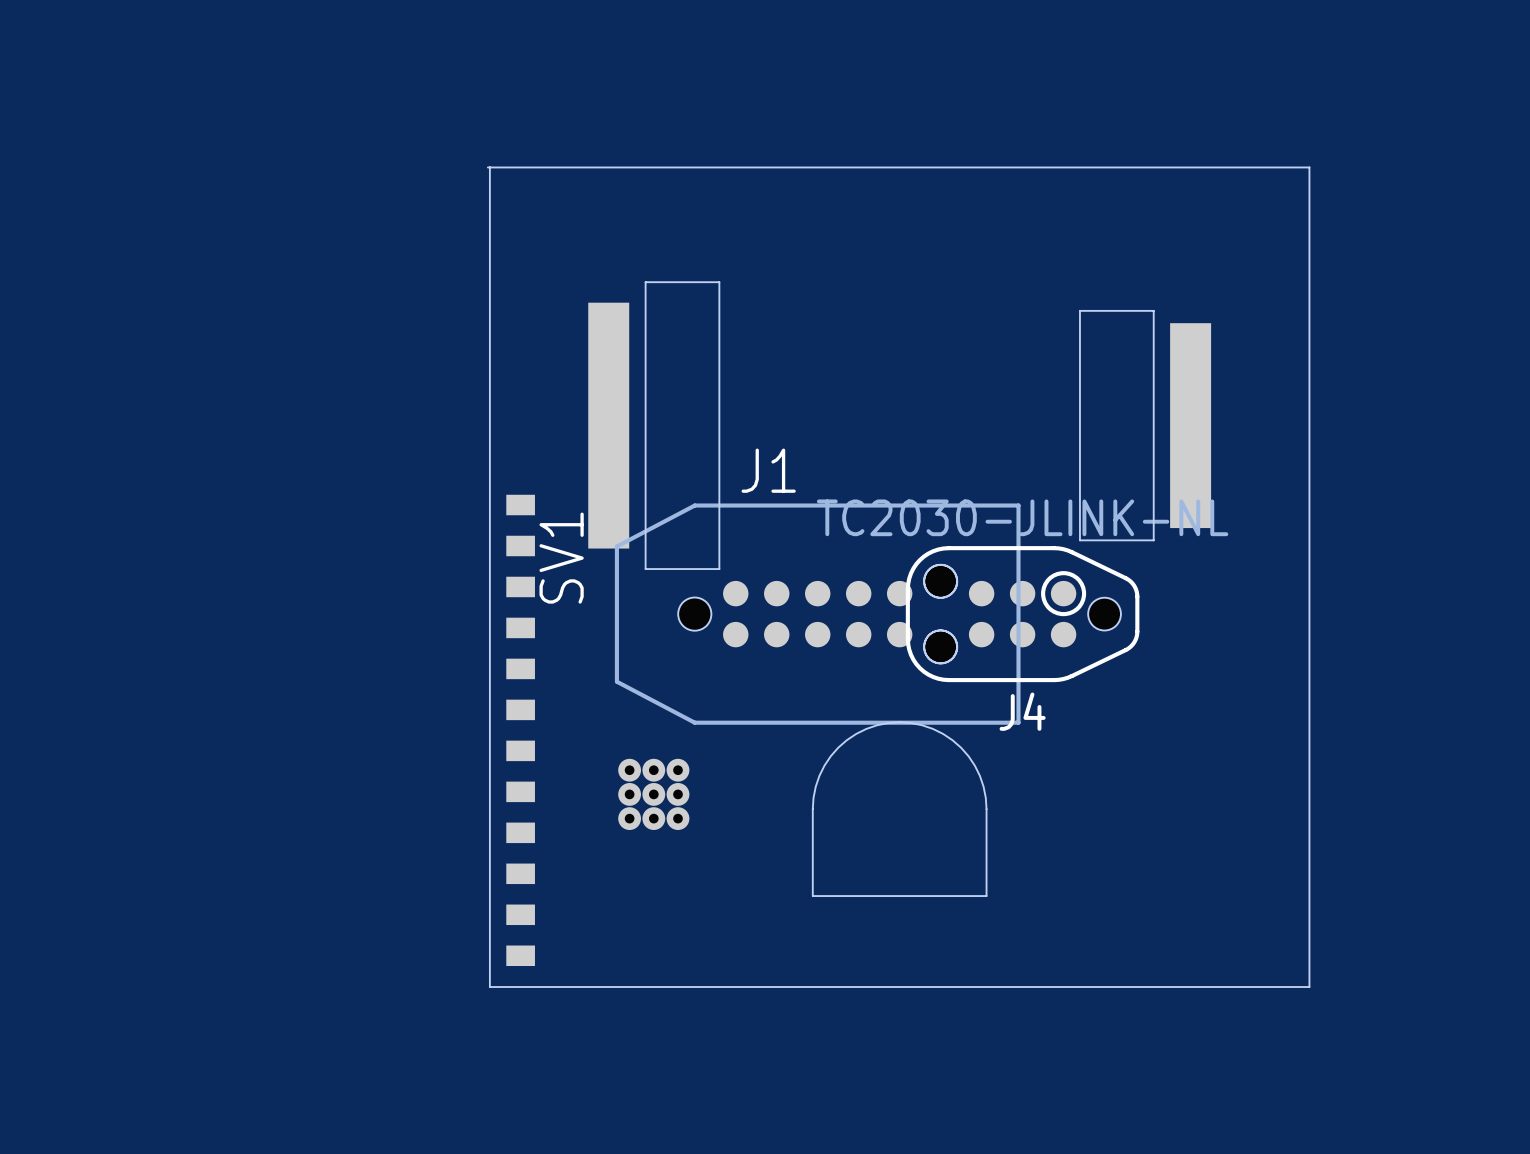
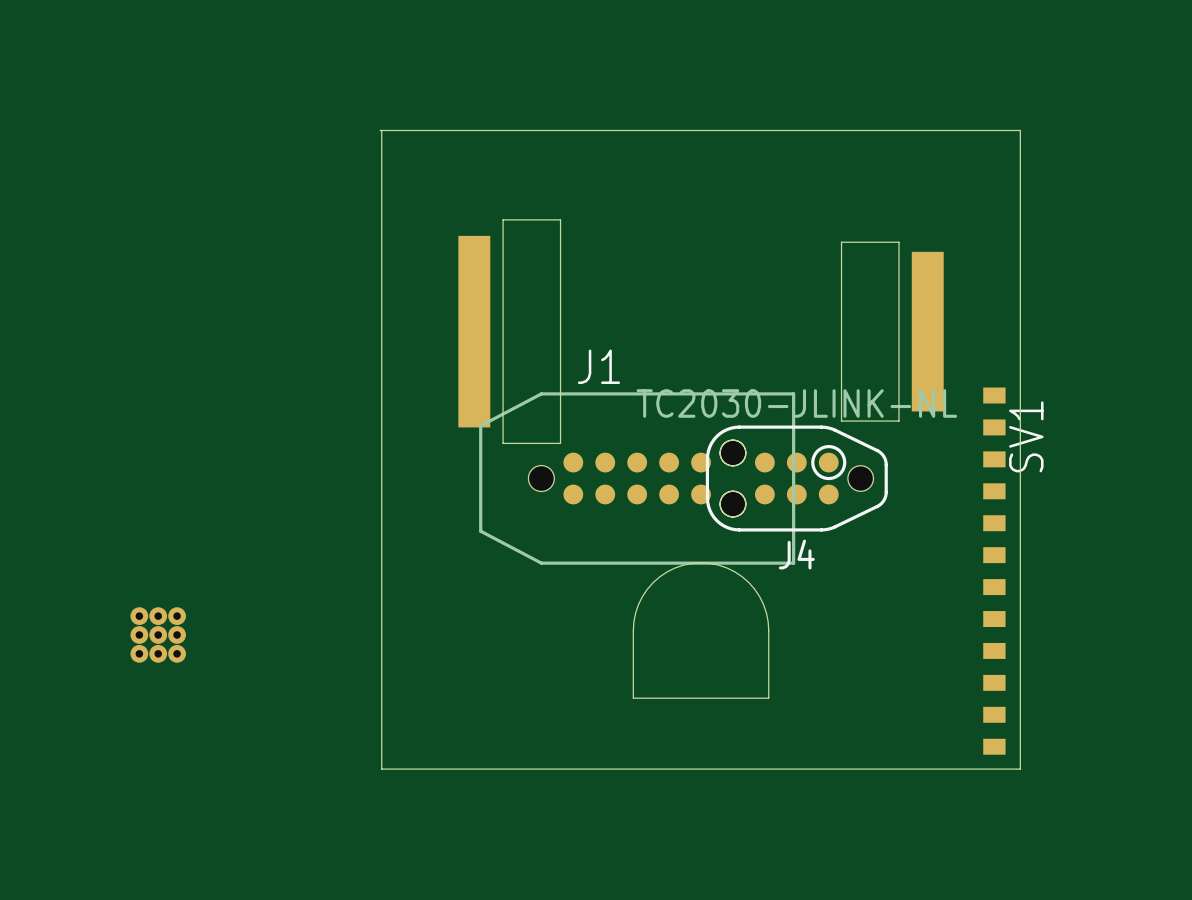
SV1 position: (520, 730) -> (994, 571)
part position: (653, 794) -> (158, 634)

